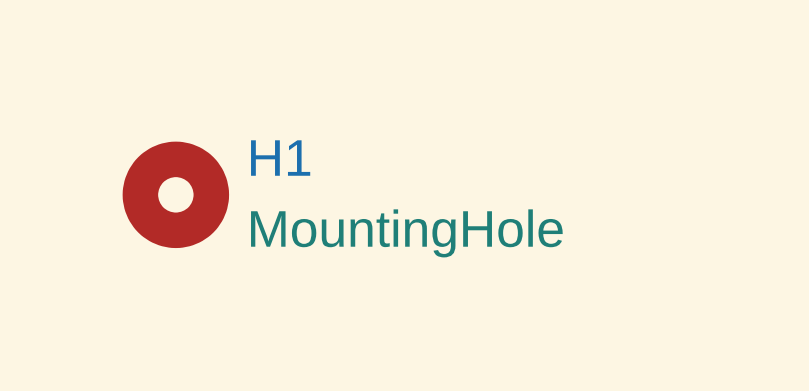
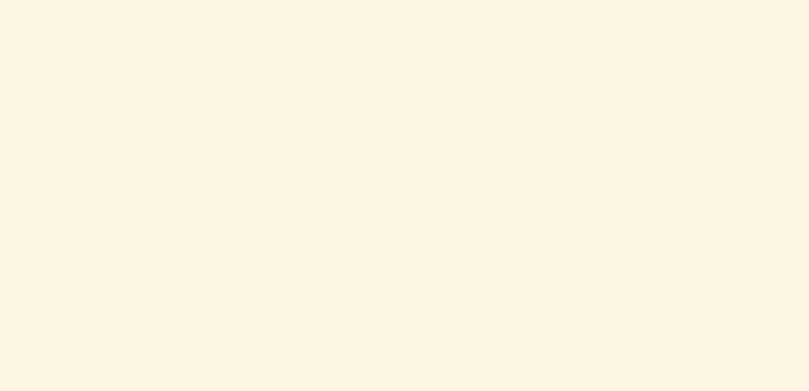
H1: MountingHole (175, 194) -> none

